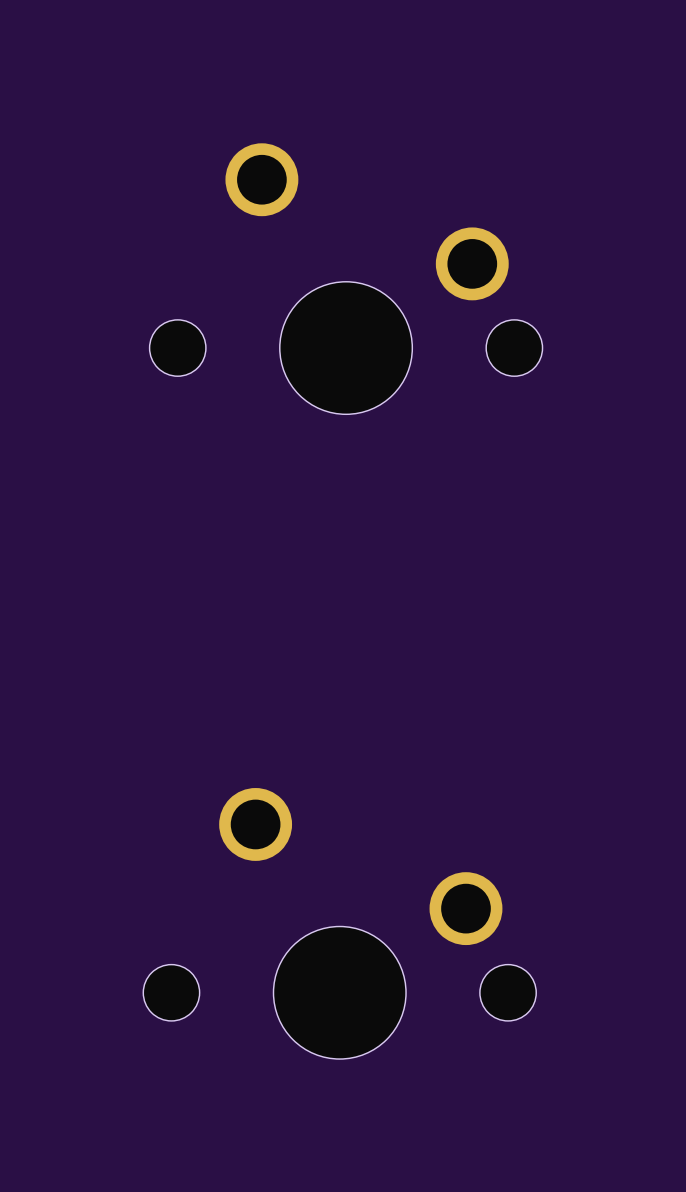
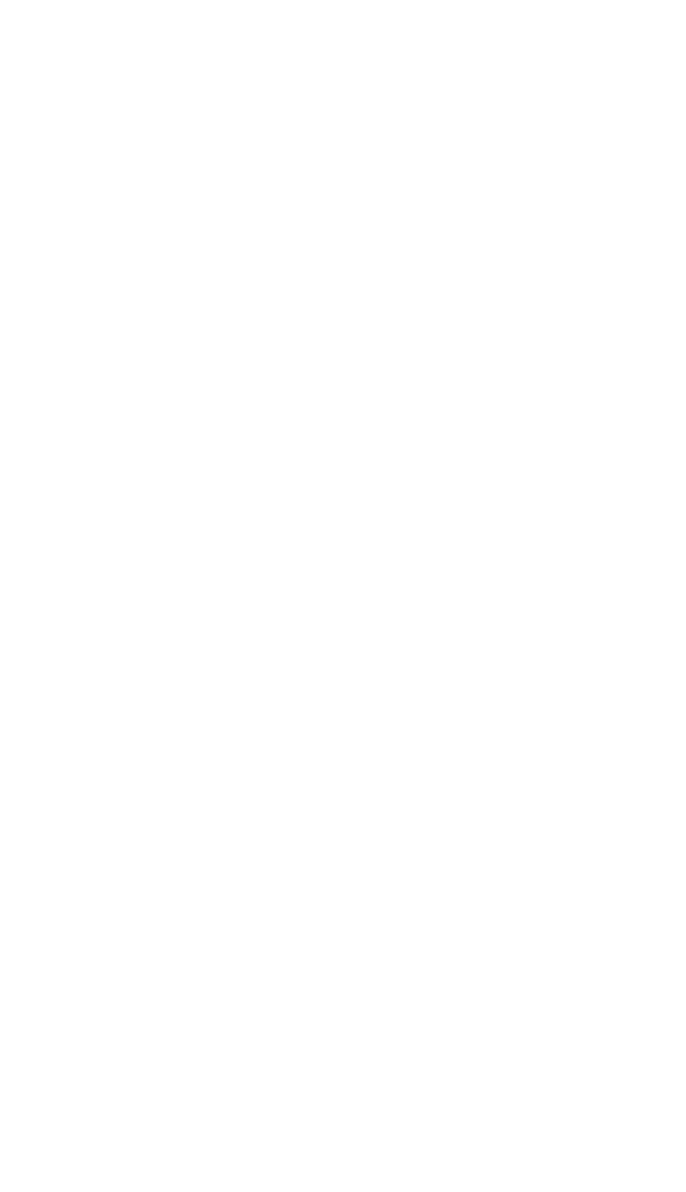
part: (346, 278) -> none
part: (339, 923) -> none

